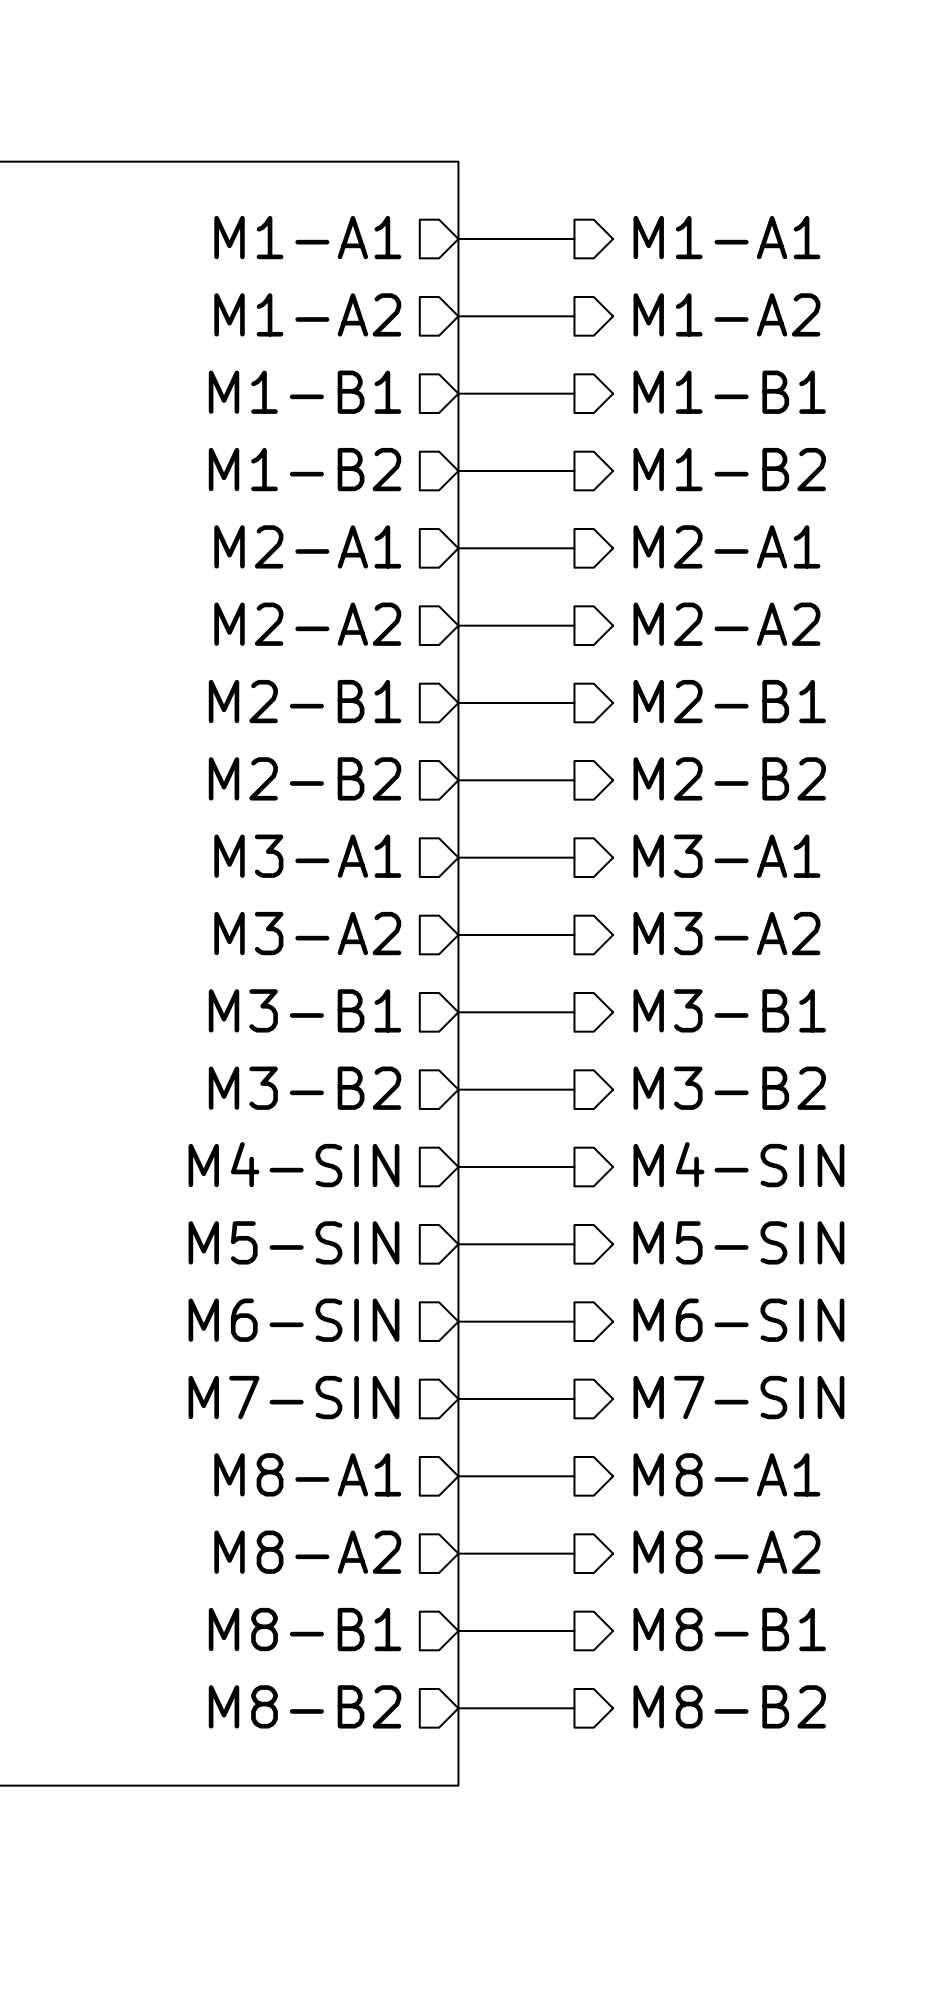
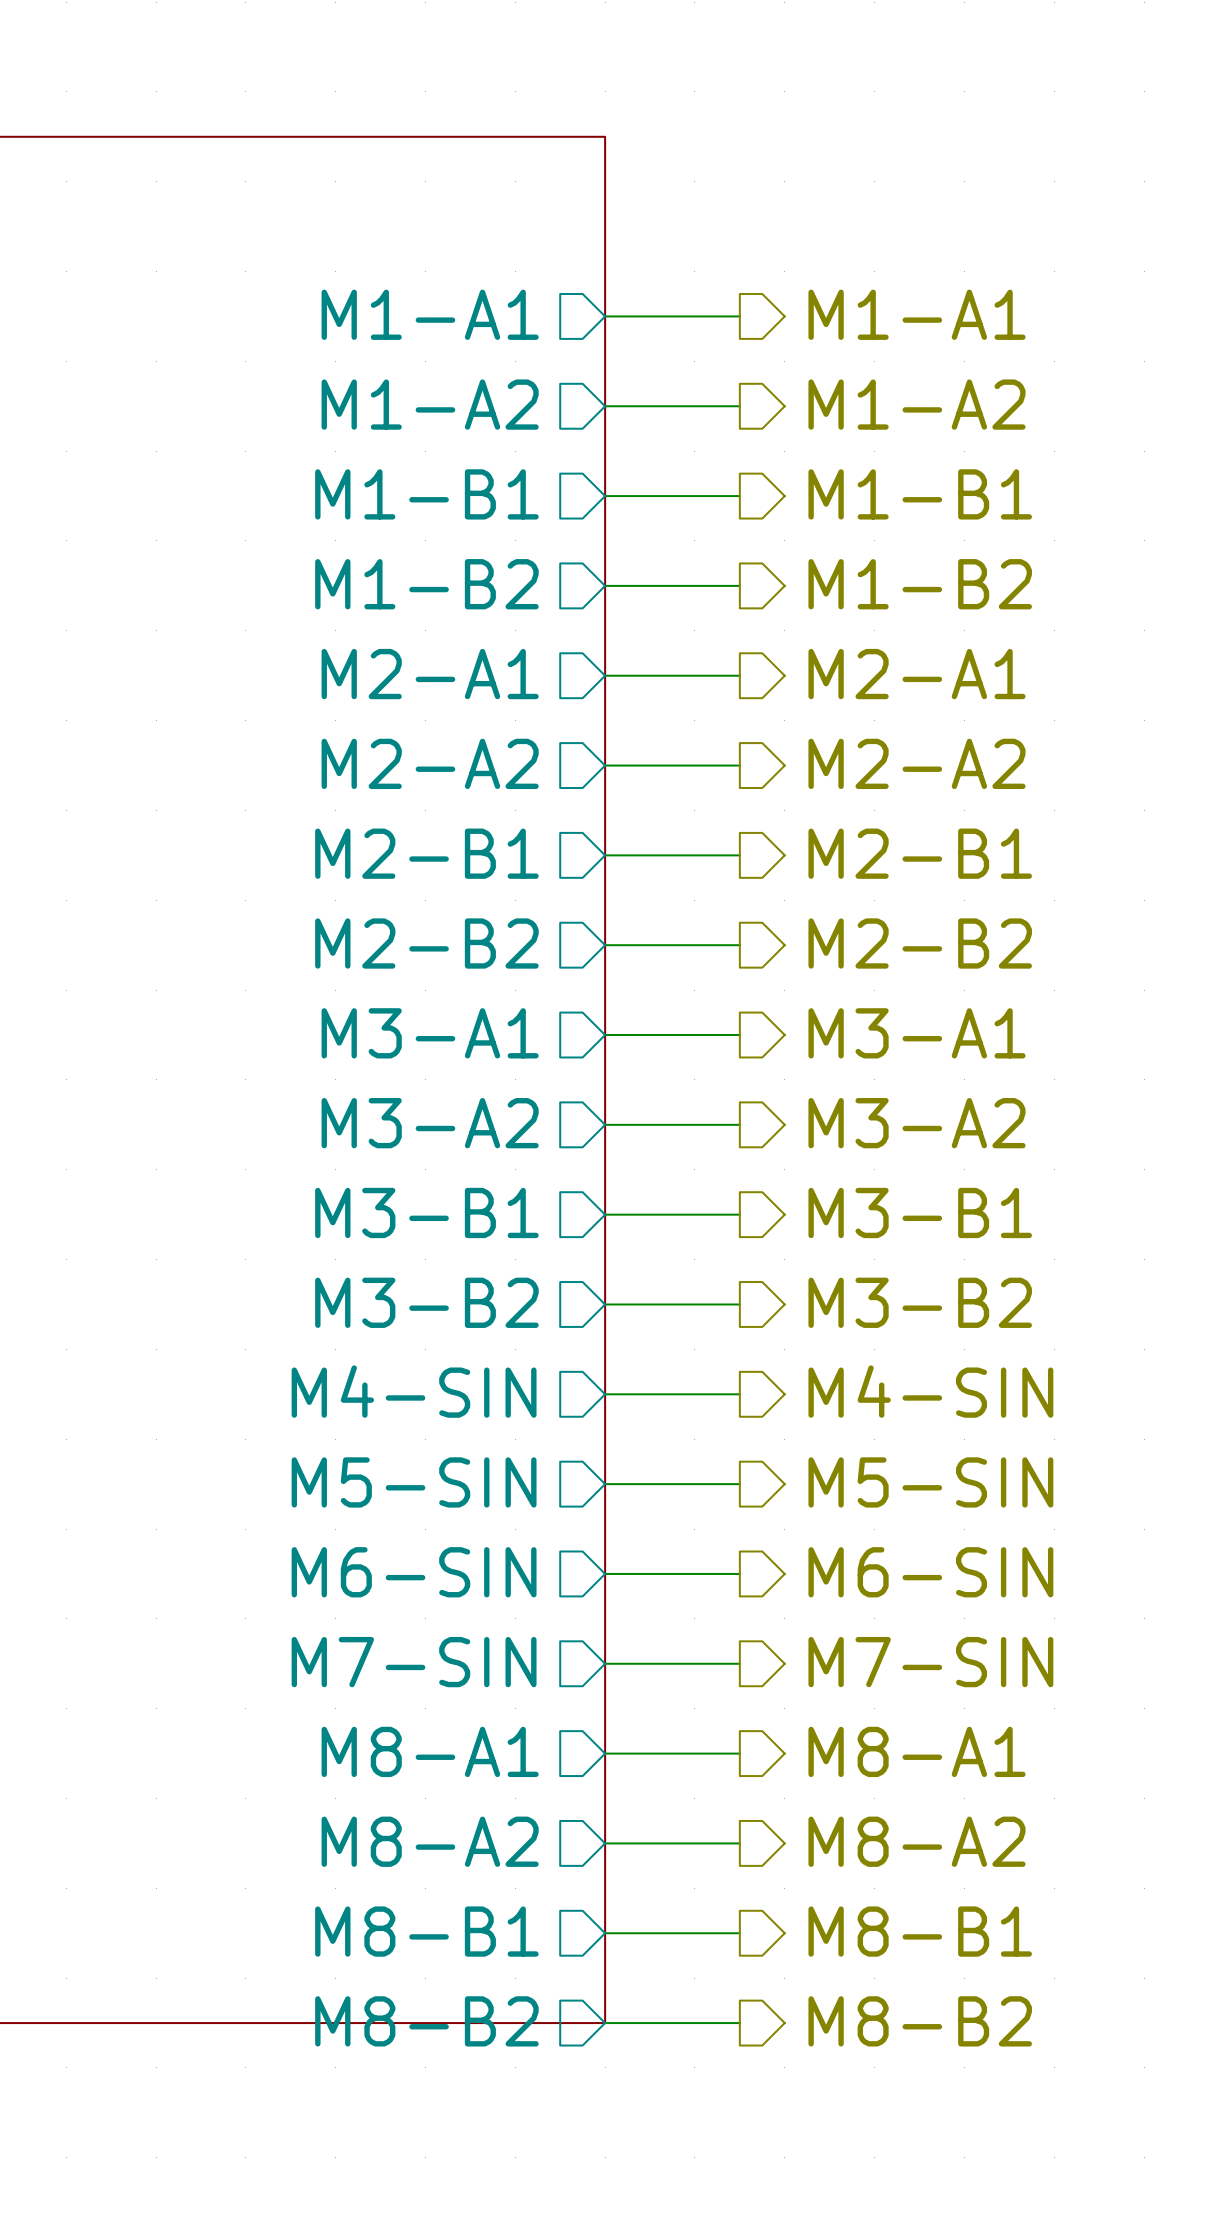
sheet pin: M1-A1 (307, 237) -> none
hierarchical label: M1-A1 (726, 237) -> none
wire: (458, 239) (574, 239) -> none
sheet pin: M1-A2 (307, 314) -> M1-A1 (430, 314)
hierarchical label: M1-A2 (726, 314) -> M1-A1 (916, 314)
sheet pin: M1-B1 (305, 392) -> M1-A2 (430, 404)
hierarchical label: M1-B1 (729, 392) -> M1-A2 (916, 404)
sheet pin: M1-B2 (305, 469) -> M1-B1 (426, 494)
hierarchical label: M1-B2 (729, 469) -> M1-B1 (920, 494)
sheet pin: M2-A1 (307, 546) -> M1-B2 (426, 584)
hierarchical label: M2-A1 (726, 546) -> M1-B2 (920, 584)
sheet pin: M2-A2 (307, 624) -> M2-A1 (430, 674)
hierarchical label: M2-A2 (726, 624) -> M2-A1 (916, 674)
sheet pin: M2-B1 (305, 701) -> M2-A2 (430, 763)
hierarchical label: M2-B1 (729, 701) -> M2-A2 (916, 763)
sheet pin: M2-B2 (305, 778) -> M2-B1 (426, 853)
hierarchical label: M2-B2 (729, 778) -> M2-B1 (920, 853)
sheet pin: M3-A1 (307, 856) -> M2-B2 (426, 943)
hierarchical label: M3-A1 (726, 856) -> M2-B2 (920, 943)
sheet pin: M3-A2 (307, 933) -> M3-A1 (430, 1033)
hierarchical label: M3-A2 (726, 933) -> M3-A1 (916, 1033)
sheet pin: M3-B1 (305, 1010) -> M3-A2 (430, 1123)
hierarchical label: M3-B1 (729, 1010) -> M3-A2 (916, 1123)
sheet pin: M3-B2 (305, 1088) -> M3-B1 (426, 1212)
hierarchical label: M3-B2 (729, 1088) -> M3-B1 (920, 1212)
sheet pin: M4-SIN (293, 1164) -> M3-B2 (426, 1302)
hierarchical label: M4-SIN (738, 1164) -> M3-B2 (920, 1302)
sheet pin: M5-SIN (293, 1242) -> M4-SIN (414, 1391)
hierarchical label: M5-SIN (738, 1242) -> M4-SIN (930, 1391)
sheet pin: M6-SIN (293, 1320) -> M5-SIN (414, 1482)
hierarchical label: M6-SIN (738, 1320) -> M5-SIN (930, 1482)
sheet pin: M7-SIN (293, 1397) -> M6-SIN (414, 1572)
hierarchical label: M7-SIN (738, 1397) -> M6-SIN (930, 1572)
sheet pin: M8-A1 (307, 1474) -> M7-SIN (414, 1662)
hierarchical label: M8-A1 (726, 1474) -> M7-SIN (930, 1662)
sheet pin: M8-A2 (307, 1552) -> M8-A1 (430, 1751)
hierarchical label: M8-A2 (726, 1552) -> M8-A1 (916, 1751)
sheet pin: M8-B1 (305, 1629) -> M8-A2 (430, 1841)
hierarchical label: M8-B1 (729, 1629) -> M8-A2 (916, 1841)
sheet pin: M8-B2 (305, 1706) -> M8-B1 (426, 1931)
hierarchical label: M8-B2 (729, 1706) -> M8-B1 (920, 1931)
sheet pin: none -> M8-B2 (426, 2021)
hierarchical label: none -> M8-B2 (920, 2021)
wire: none -> (605, 2023) (739, 2023)

